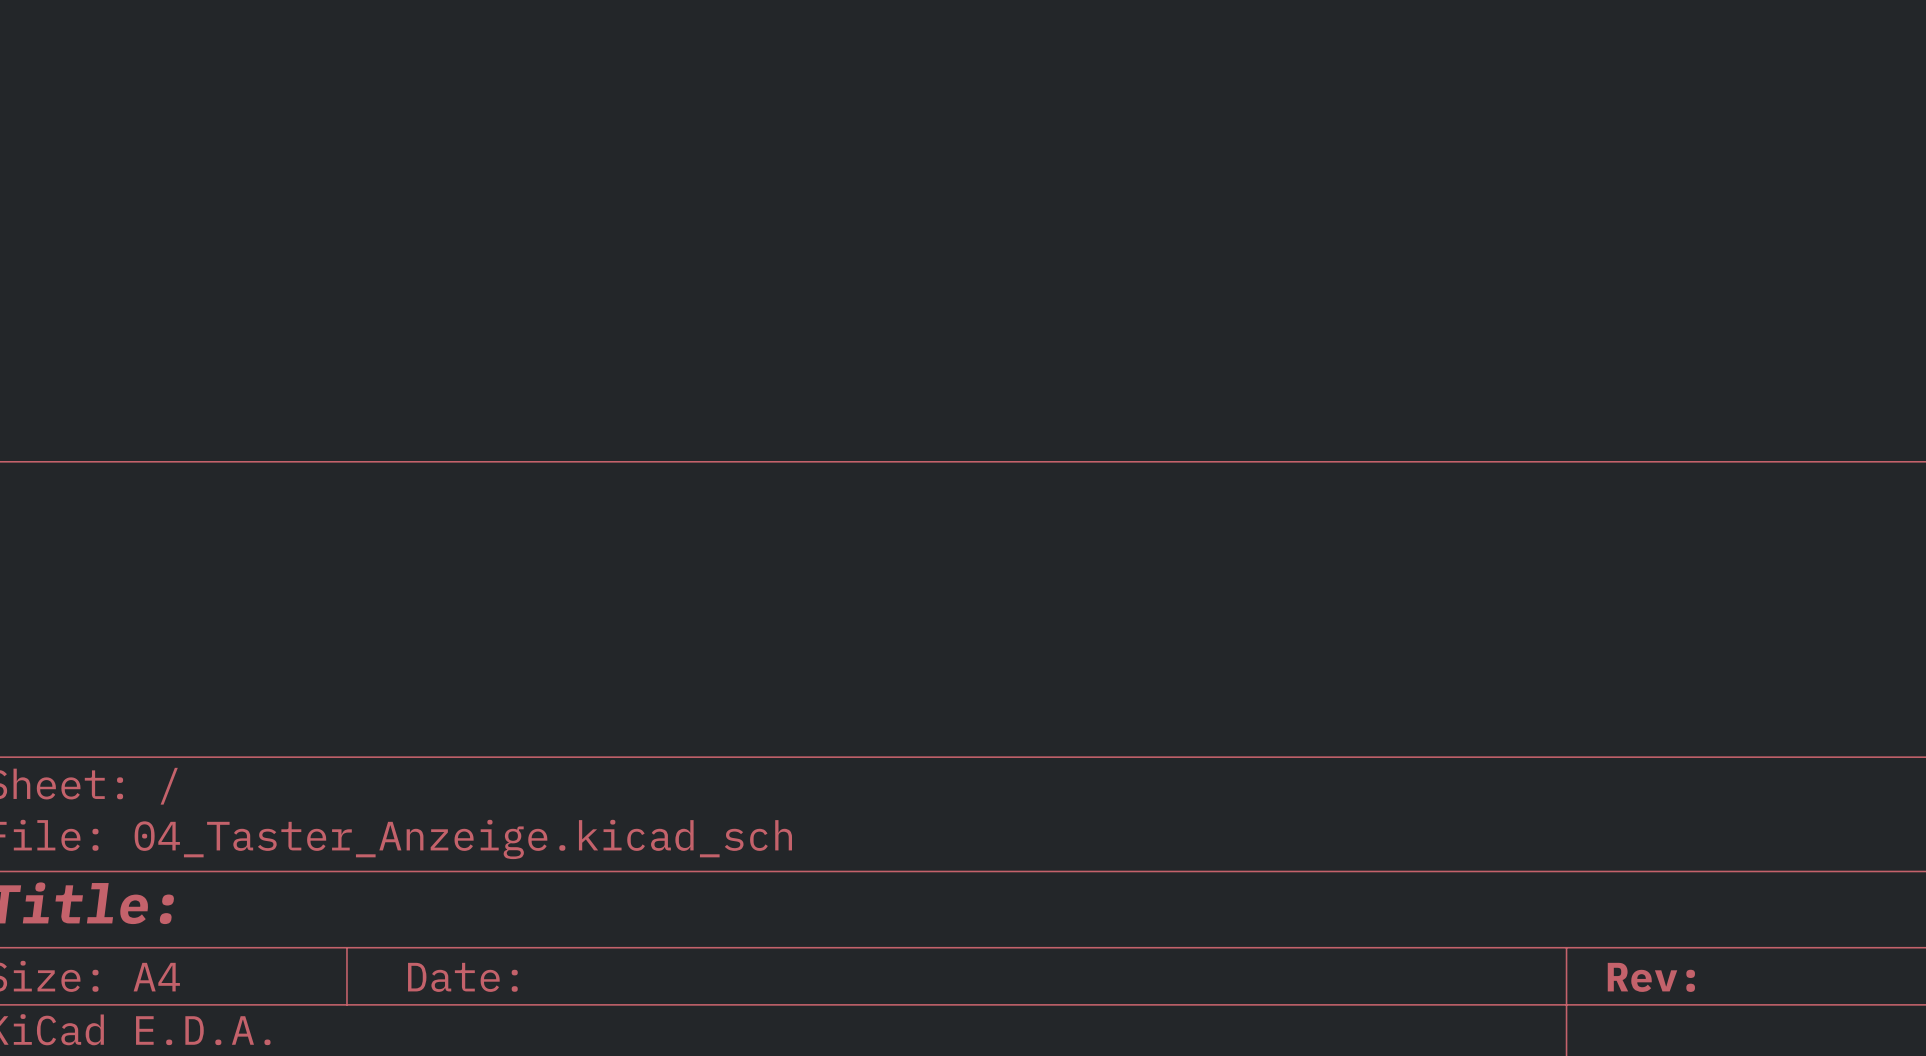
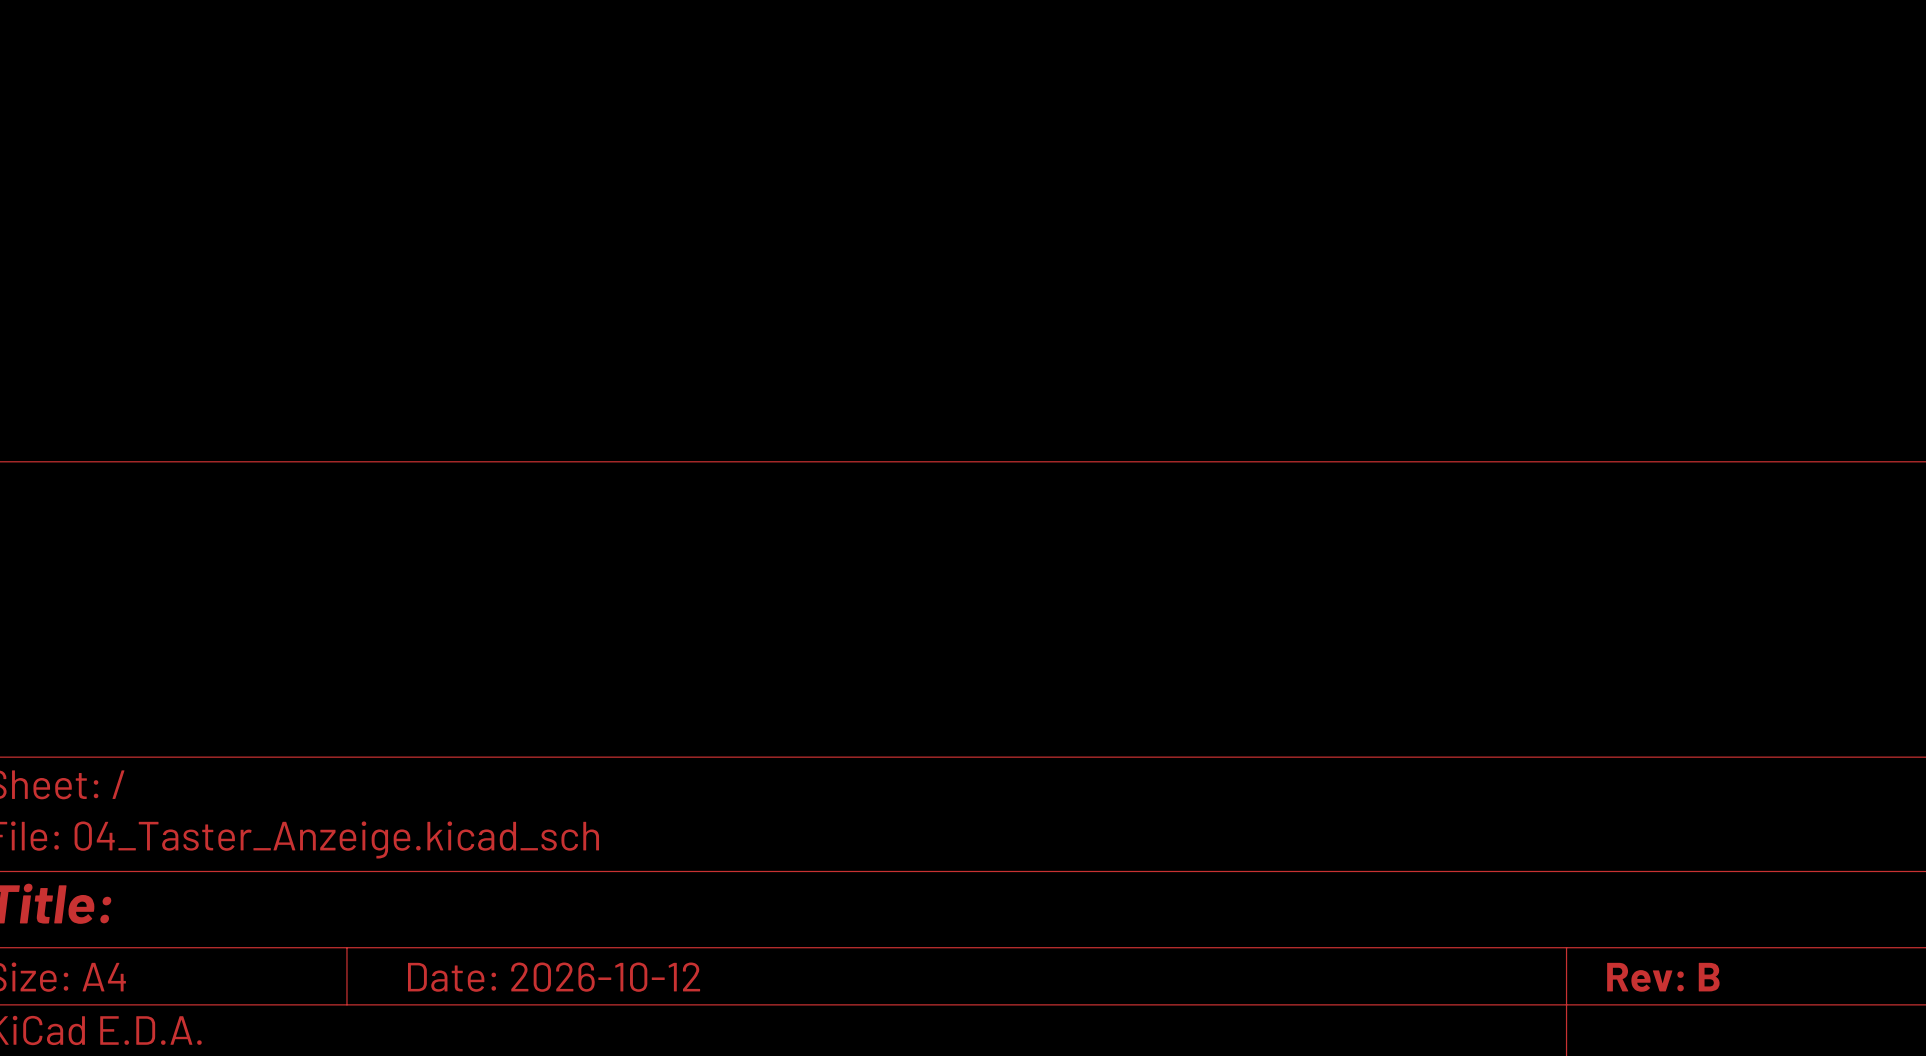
title block: Date: (462, 977) -> Date: 2026-10-12 (554, 977)
title block: Rev: (1651, 977) -> Rev: B (1663, 977)

